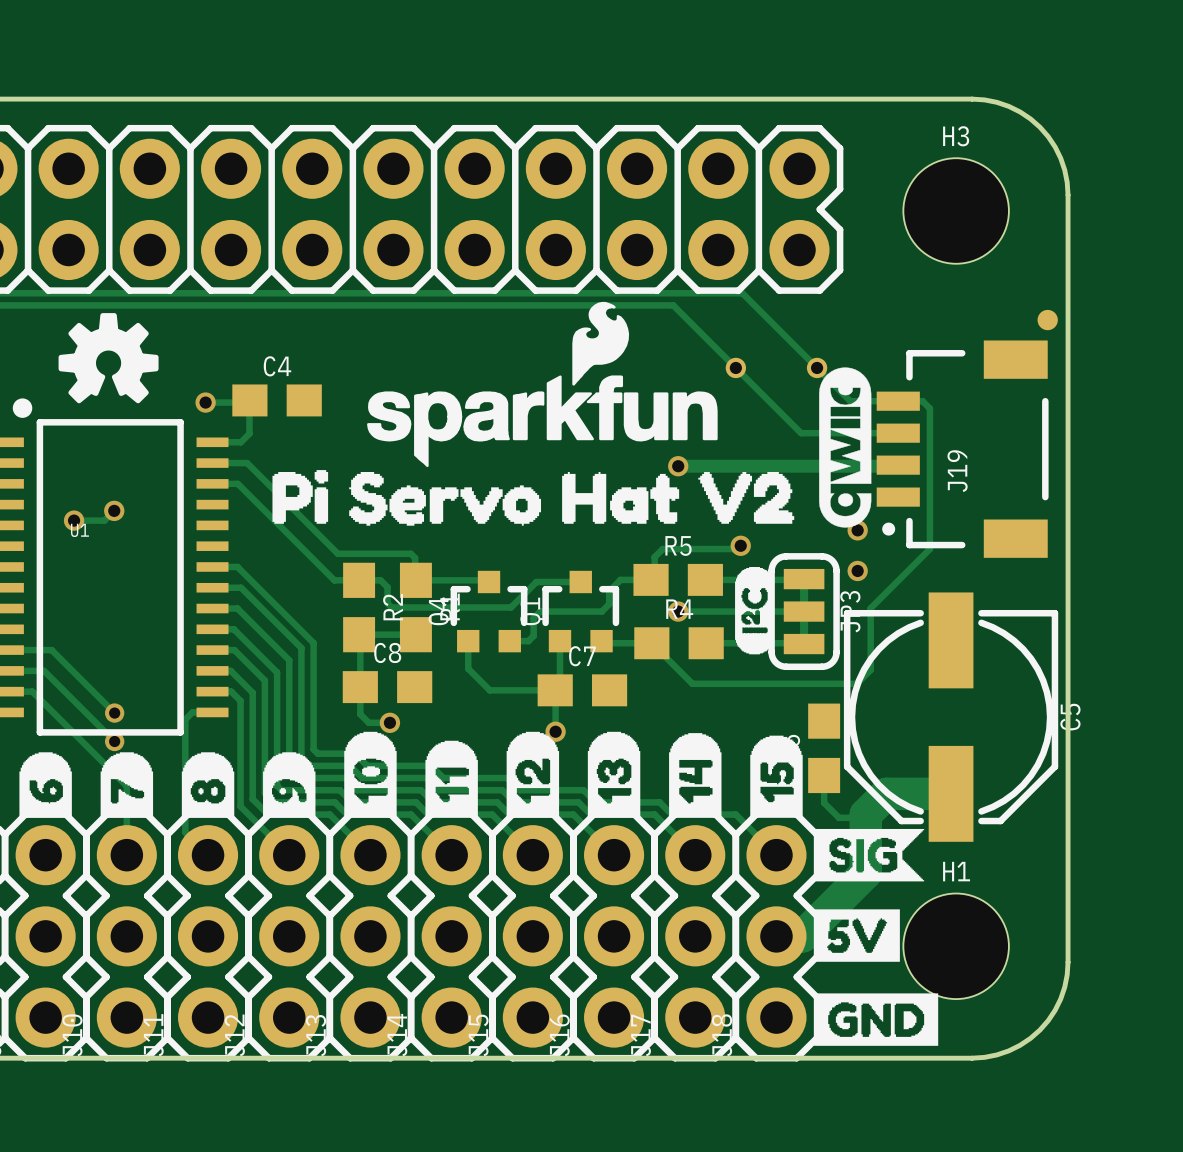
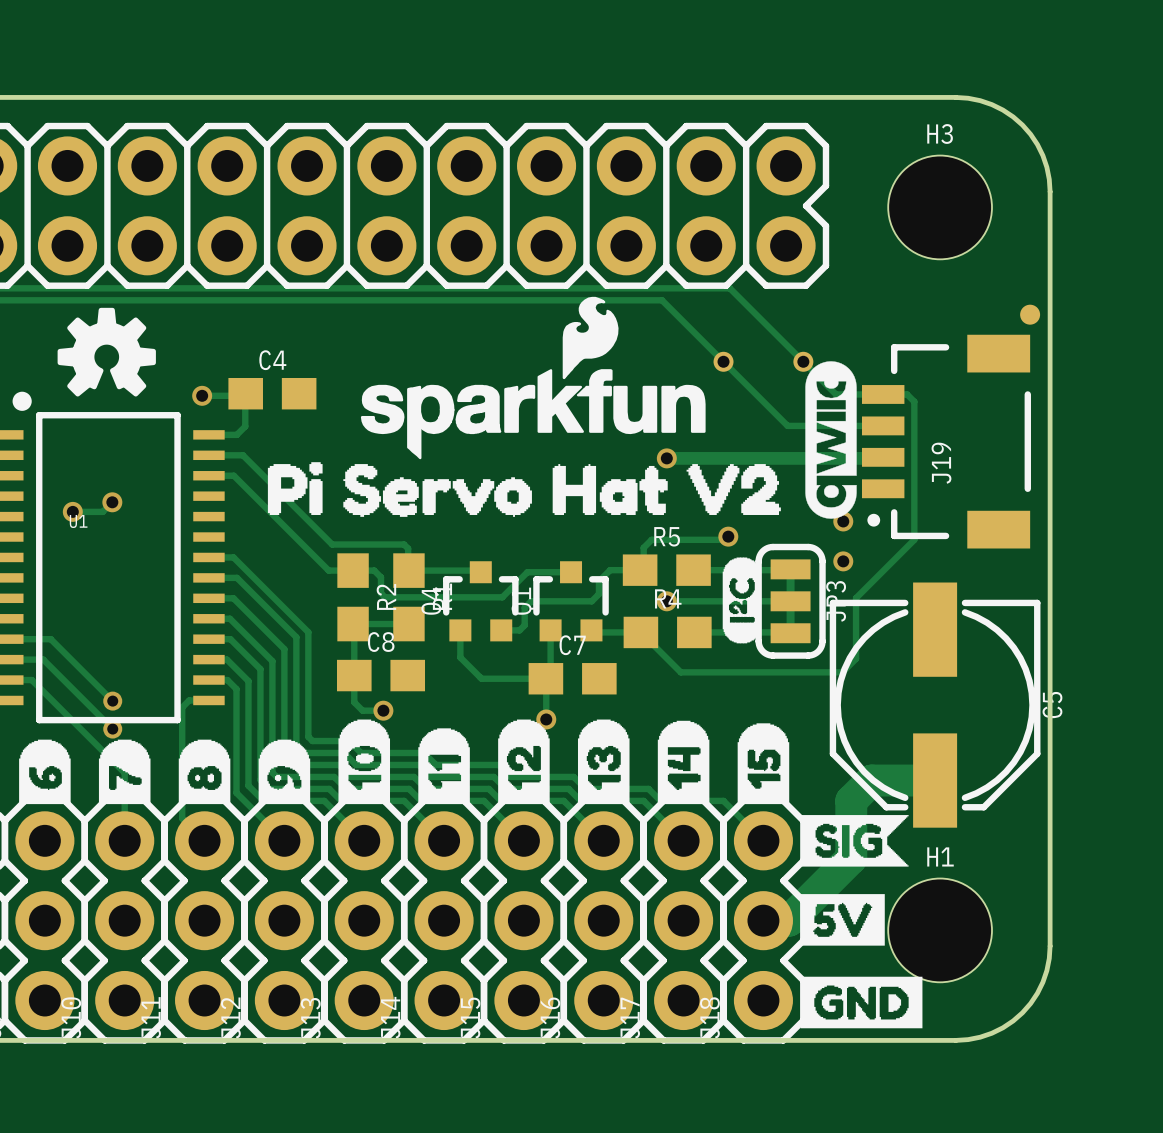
part: (824, 748) -> none
track: (824, 775) (824, 802) (839, 817) (865, 817) -> none

